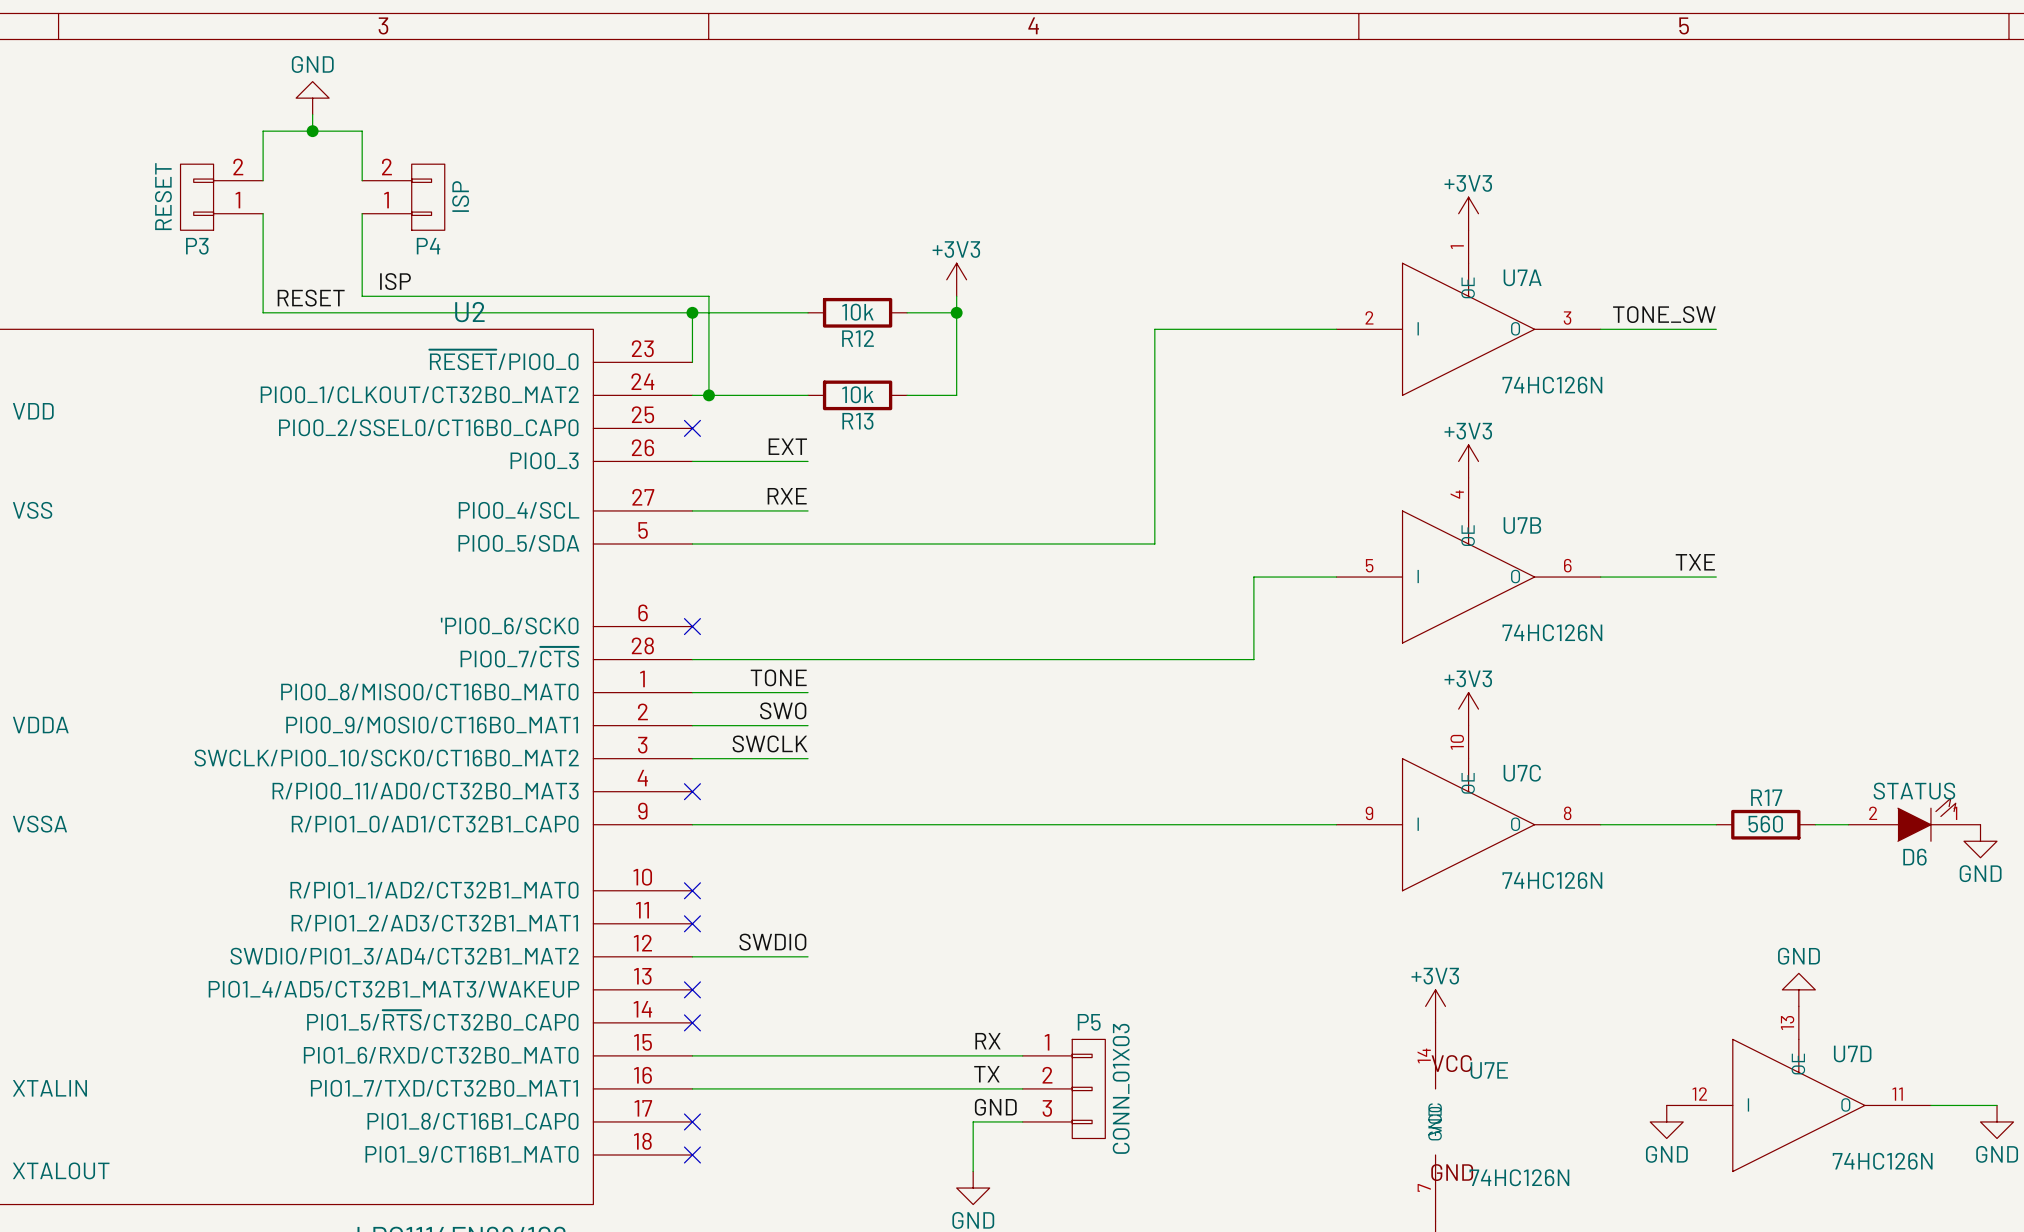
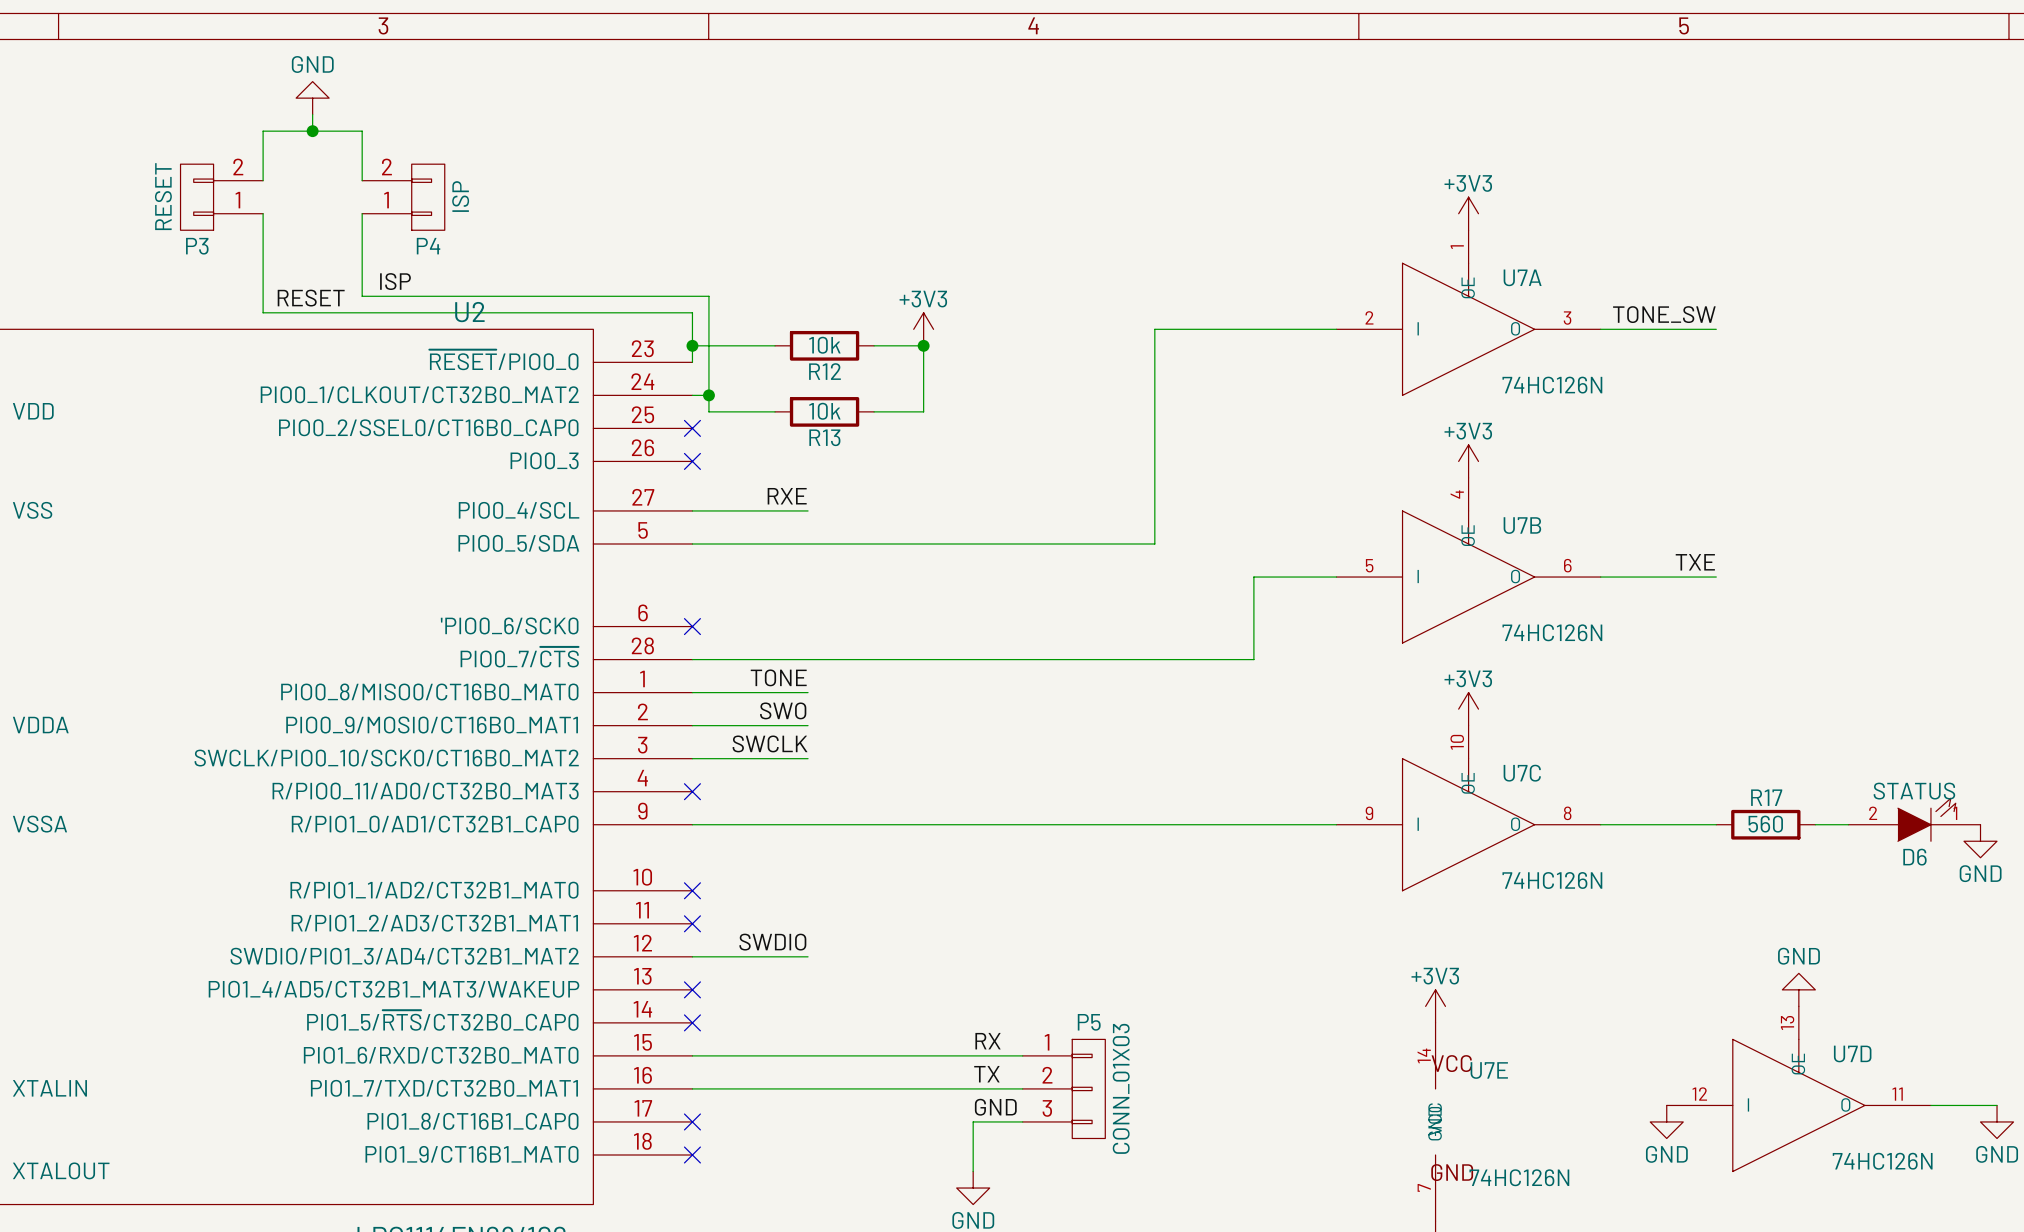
power symbol position: +3V3 (956, 279) -> +3V3 (923, 329)
wire: (956, 296) (956, 395) (907, 395) -> none
wire: (692, 312) (808, 312) -> none
junction position: (692, 312) -> (692, 345)
R12 position: (857, 312) -> (824, 345)
wire: (907, 312) (956, 312) -> none
junction position: (956, 312) -> (923, 345)
wire: none -> (692, 345) (775, 345)
wire: none -> (874, 345) (923, 345) (923, 411) (874, 411)
wire: (708, 395) (808, 395) -> (708, 395) (708, 411) (775, 411)
R13 position: (857, 395) -> (824, 411)
label: EXT (787, 446) -> none
wire: (692, 461) (808, 461) -> none
no-connect mark: none -> (692, 461)

